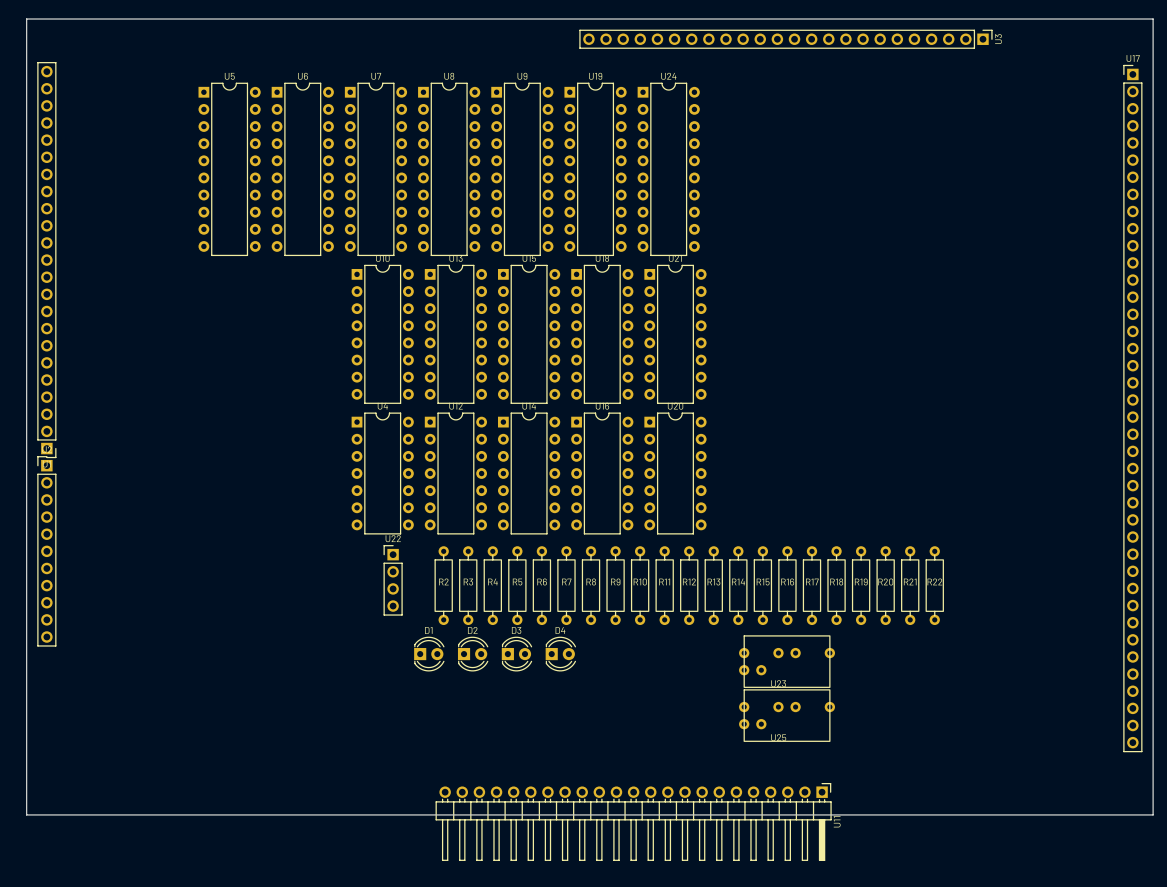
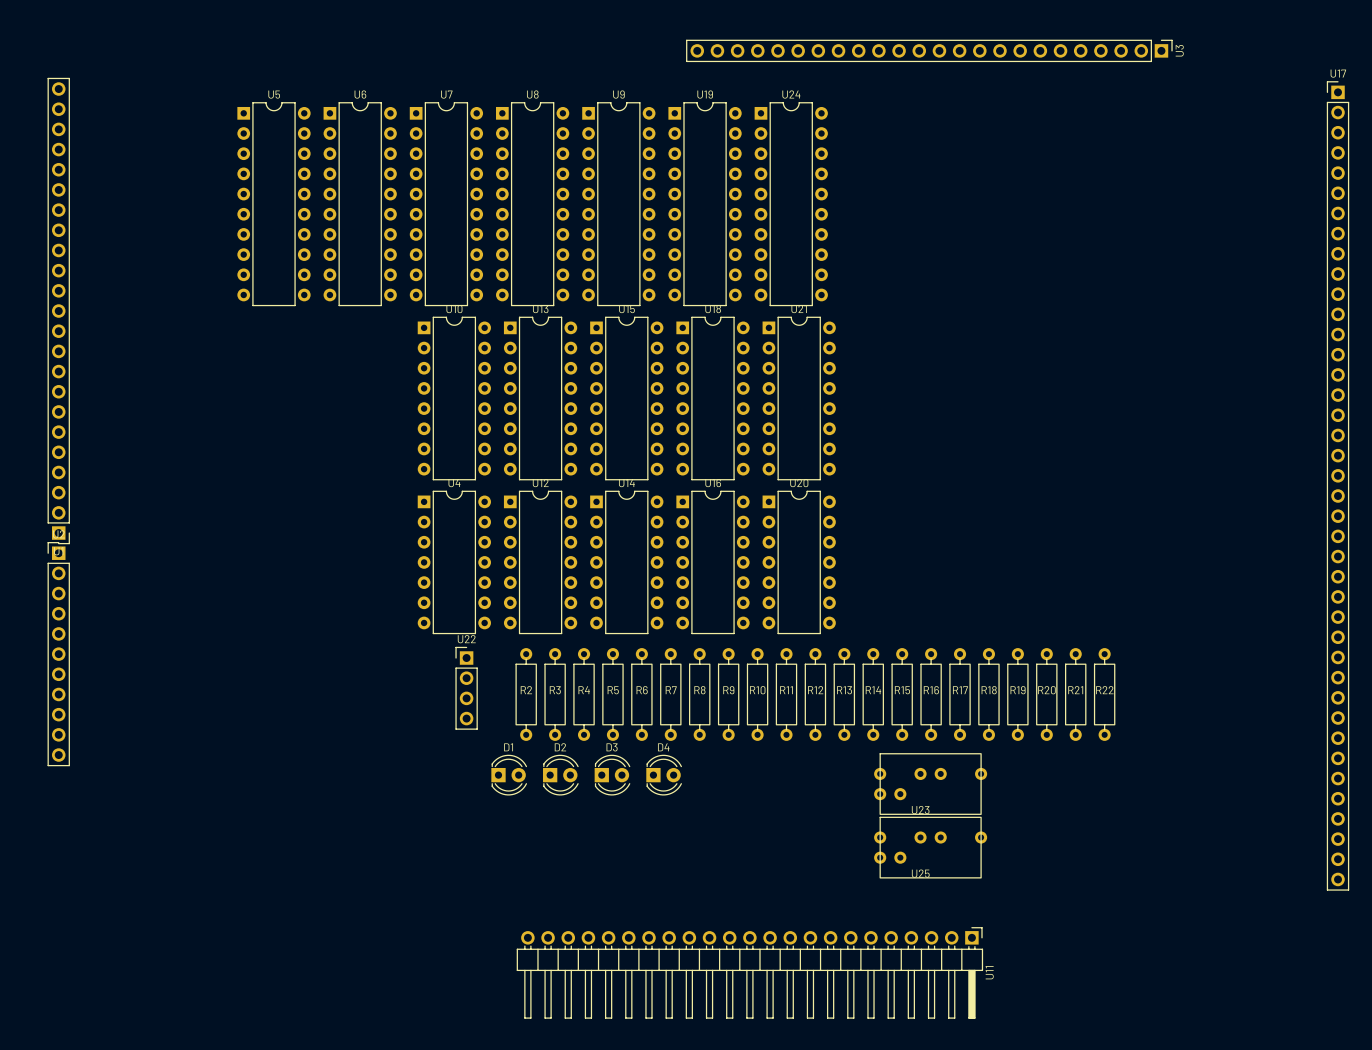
board edge: (26, 19) (1153, 19) (1153, 814) (26, 814) (26, 19) -> none

